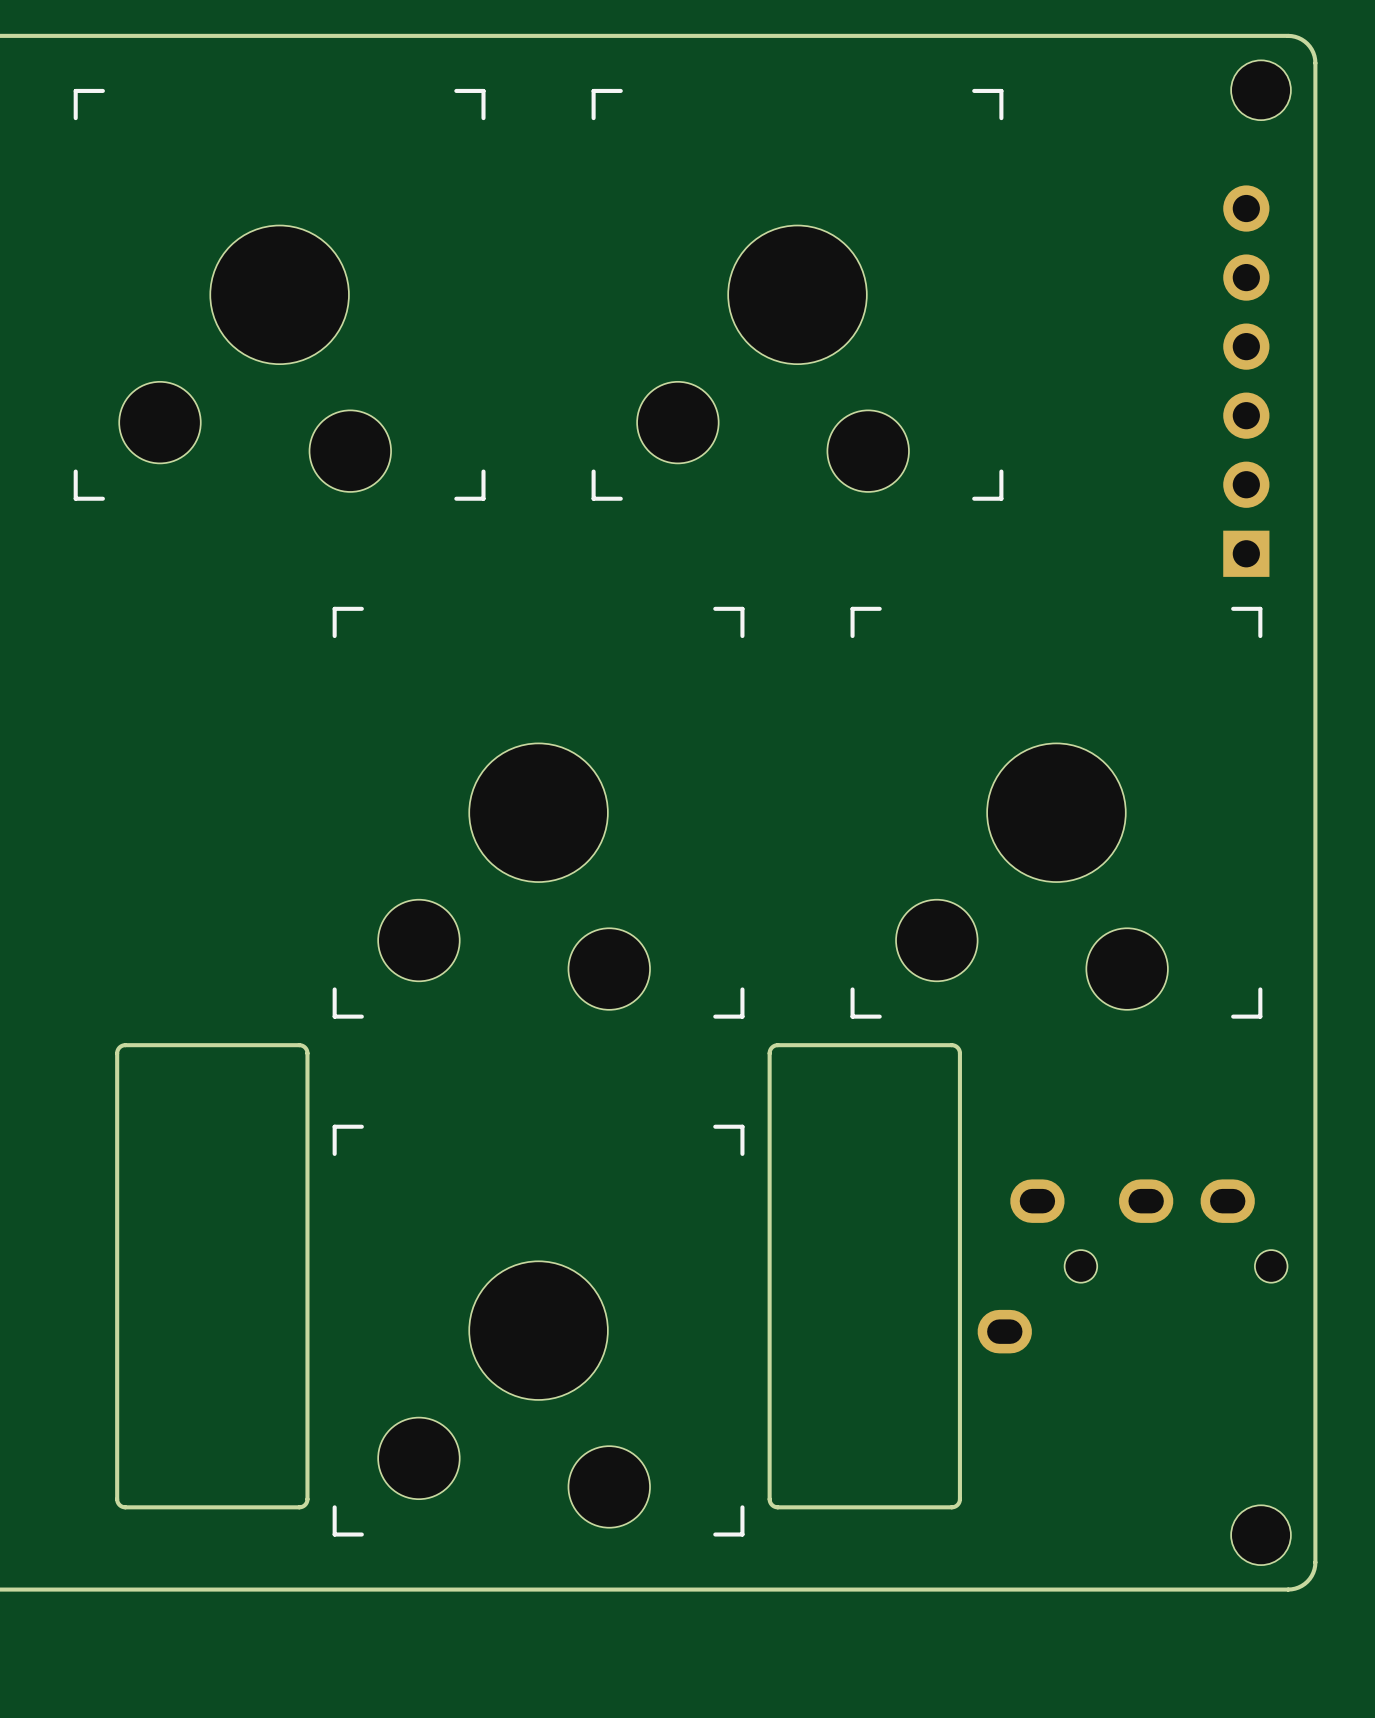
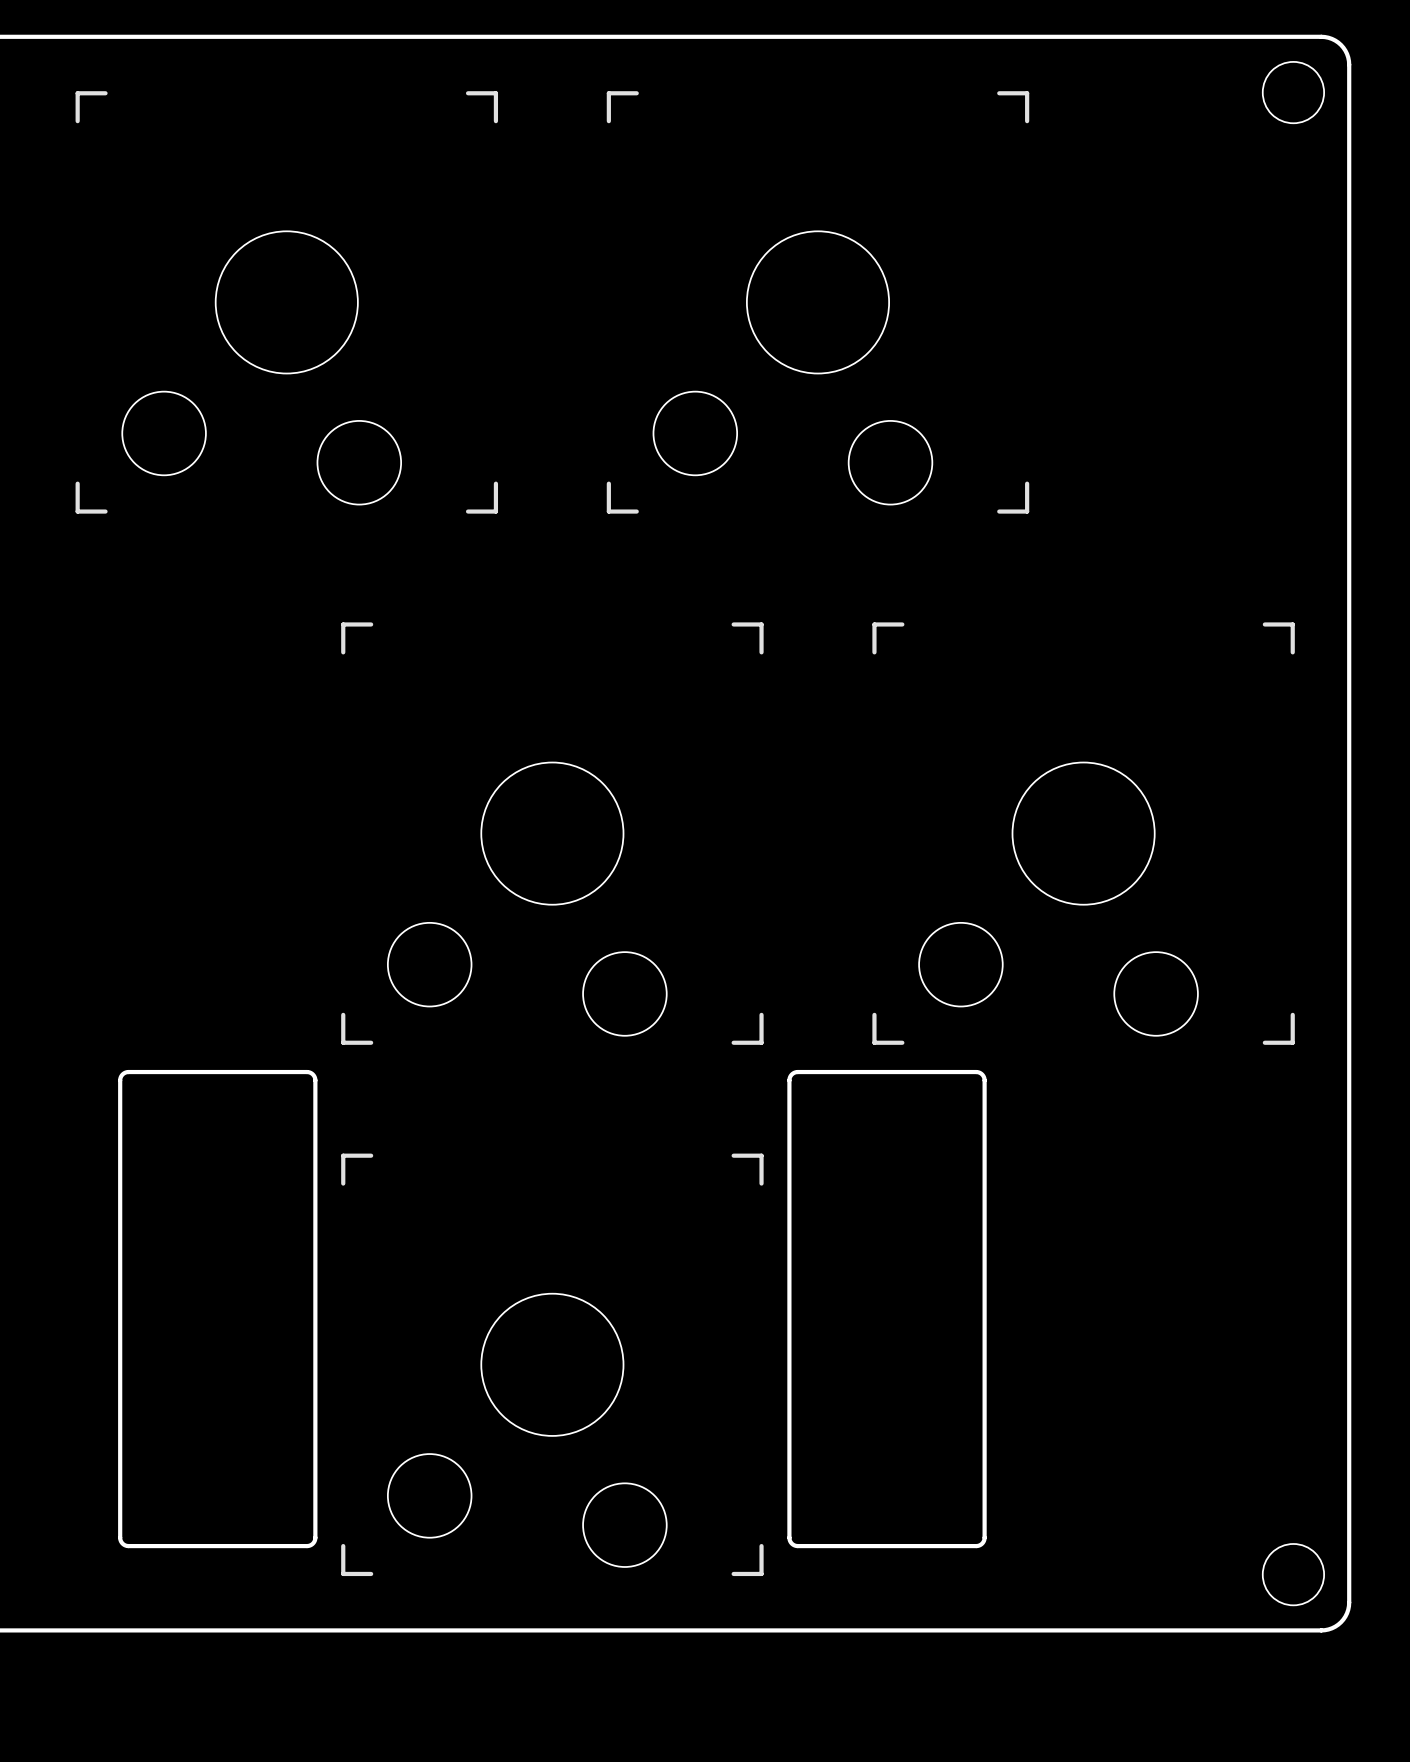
part: (1246, 381) -> none
part: (1132, 1266) -> none

